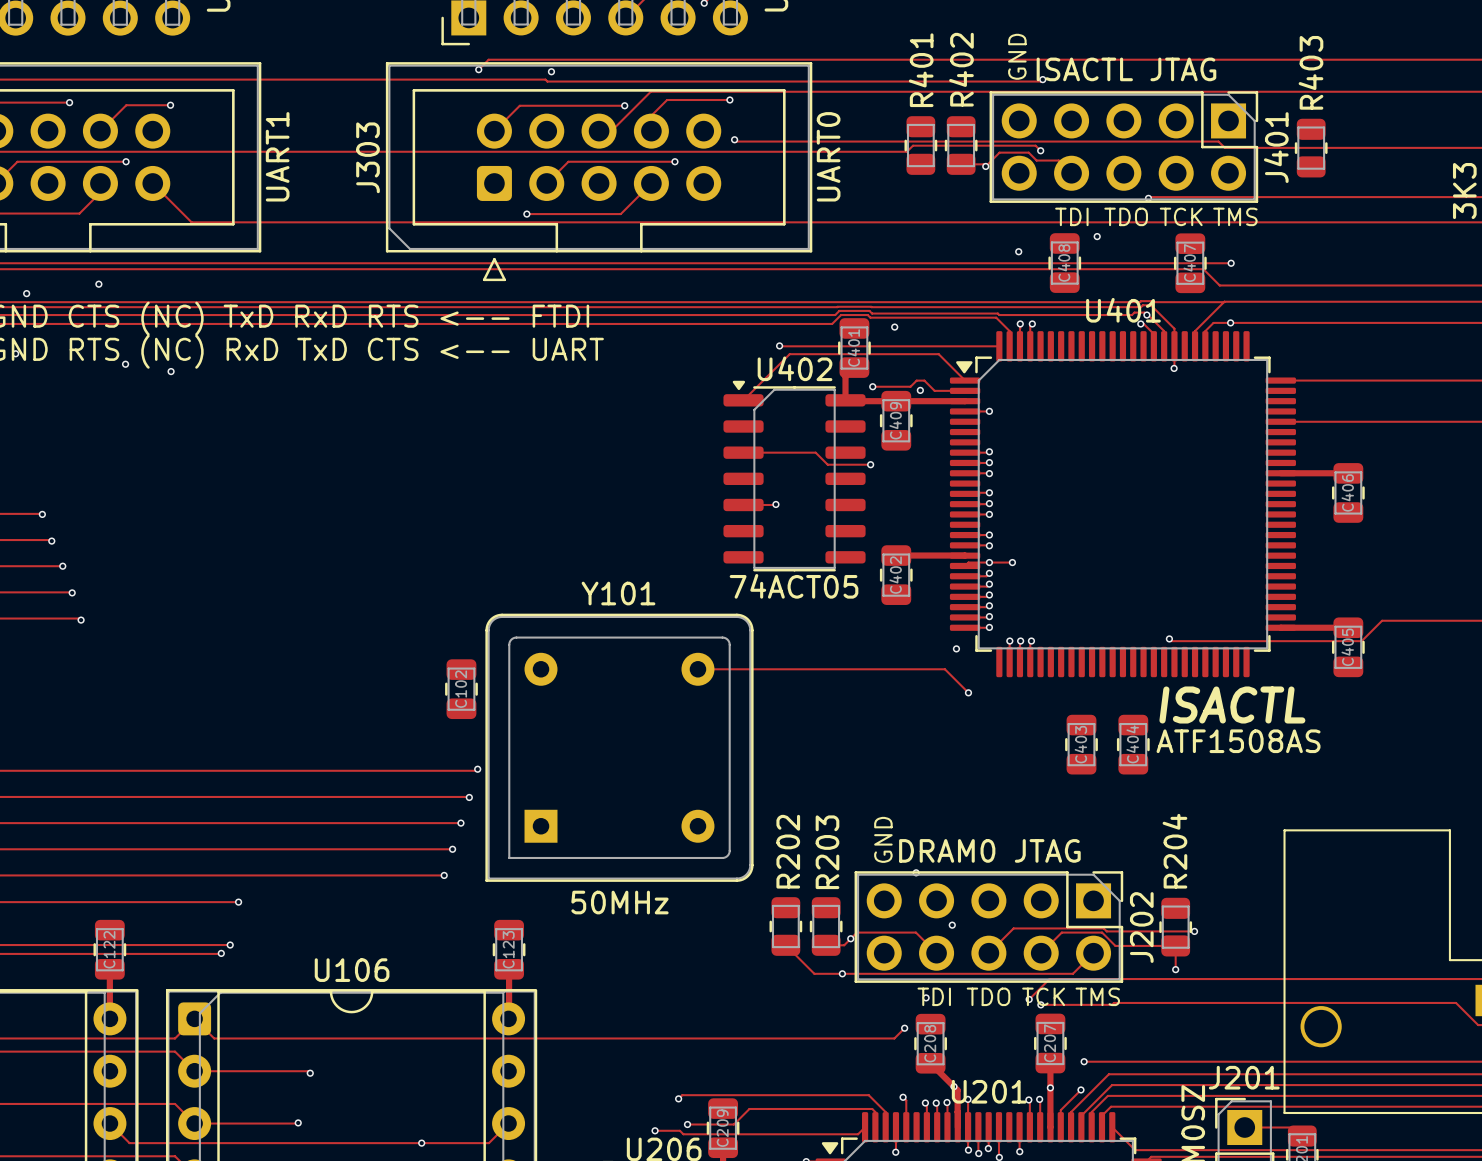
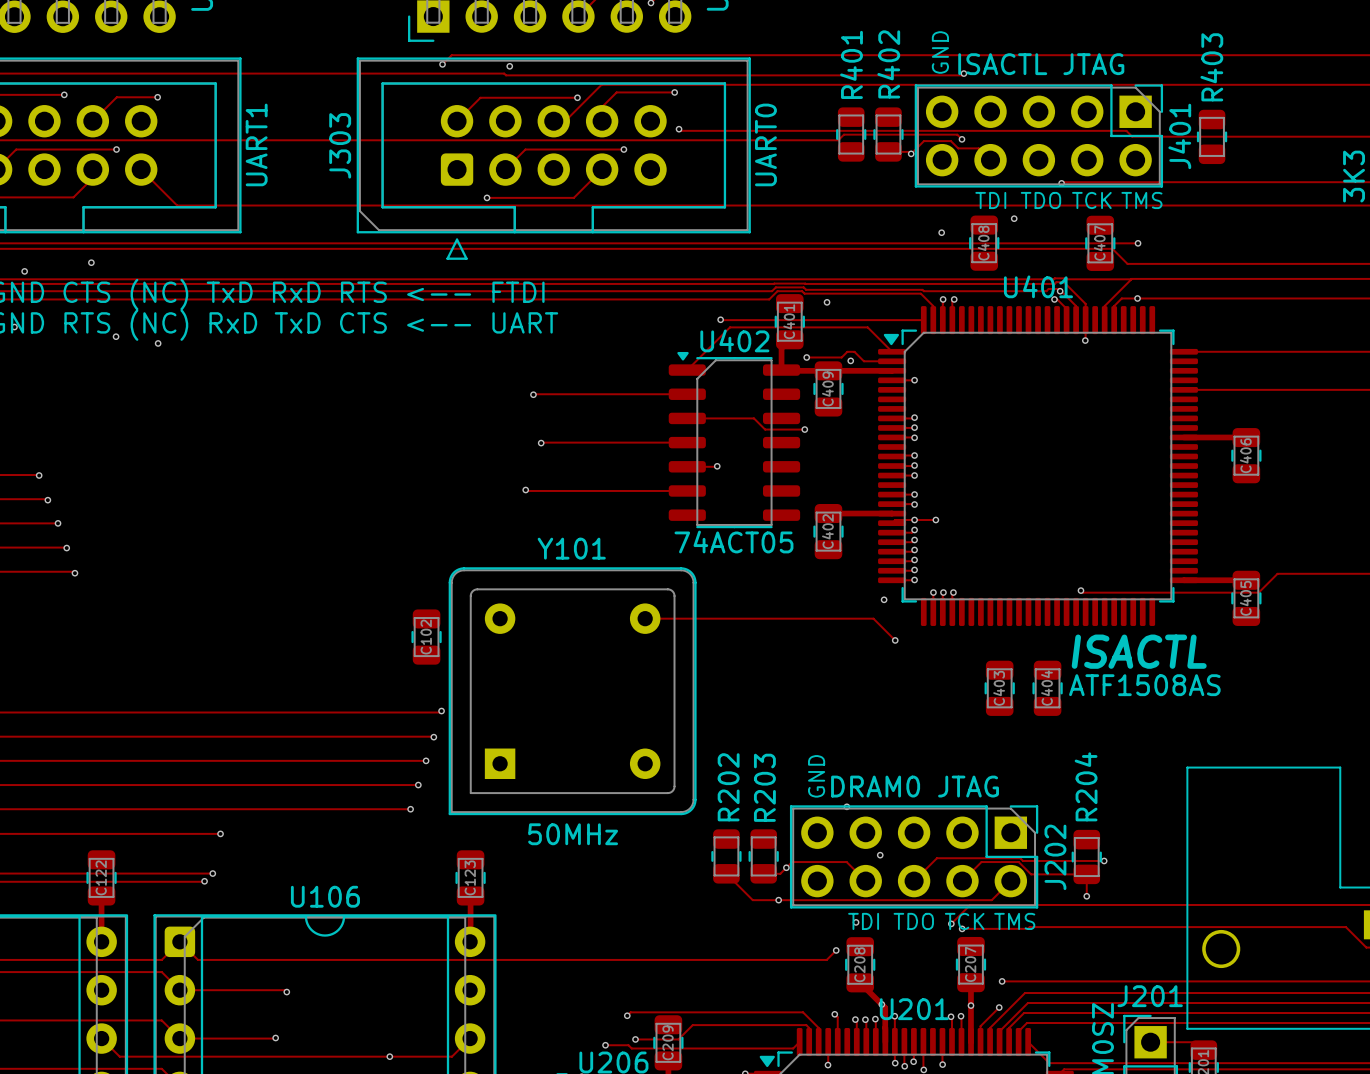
track: none -> (687, 394) (533, 394)
via: none -> (533, 394)
track: none -> (687, 442) (541, 443)
via: none -> (541, 443)
track: none -> (525, 490) (687, 490)
via: none -> (525, 490)

